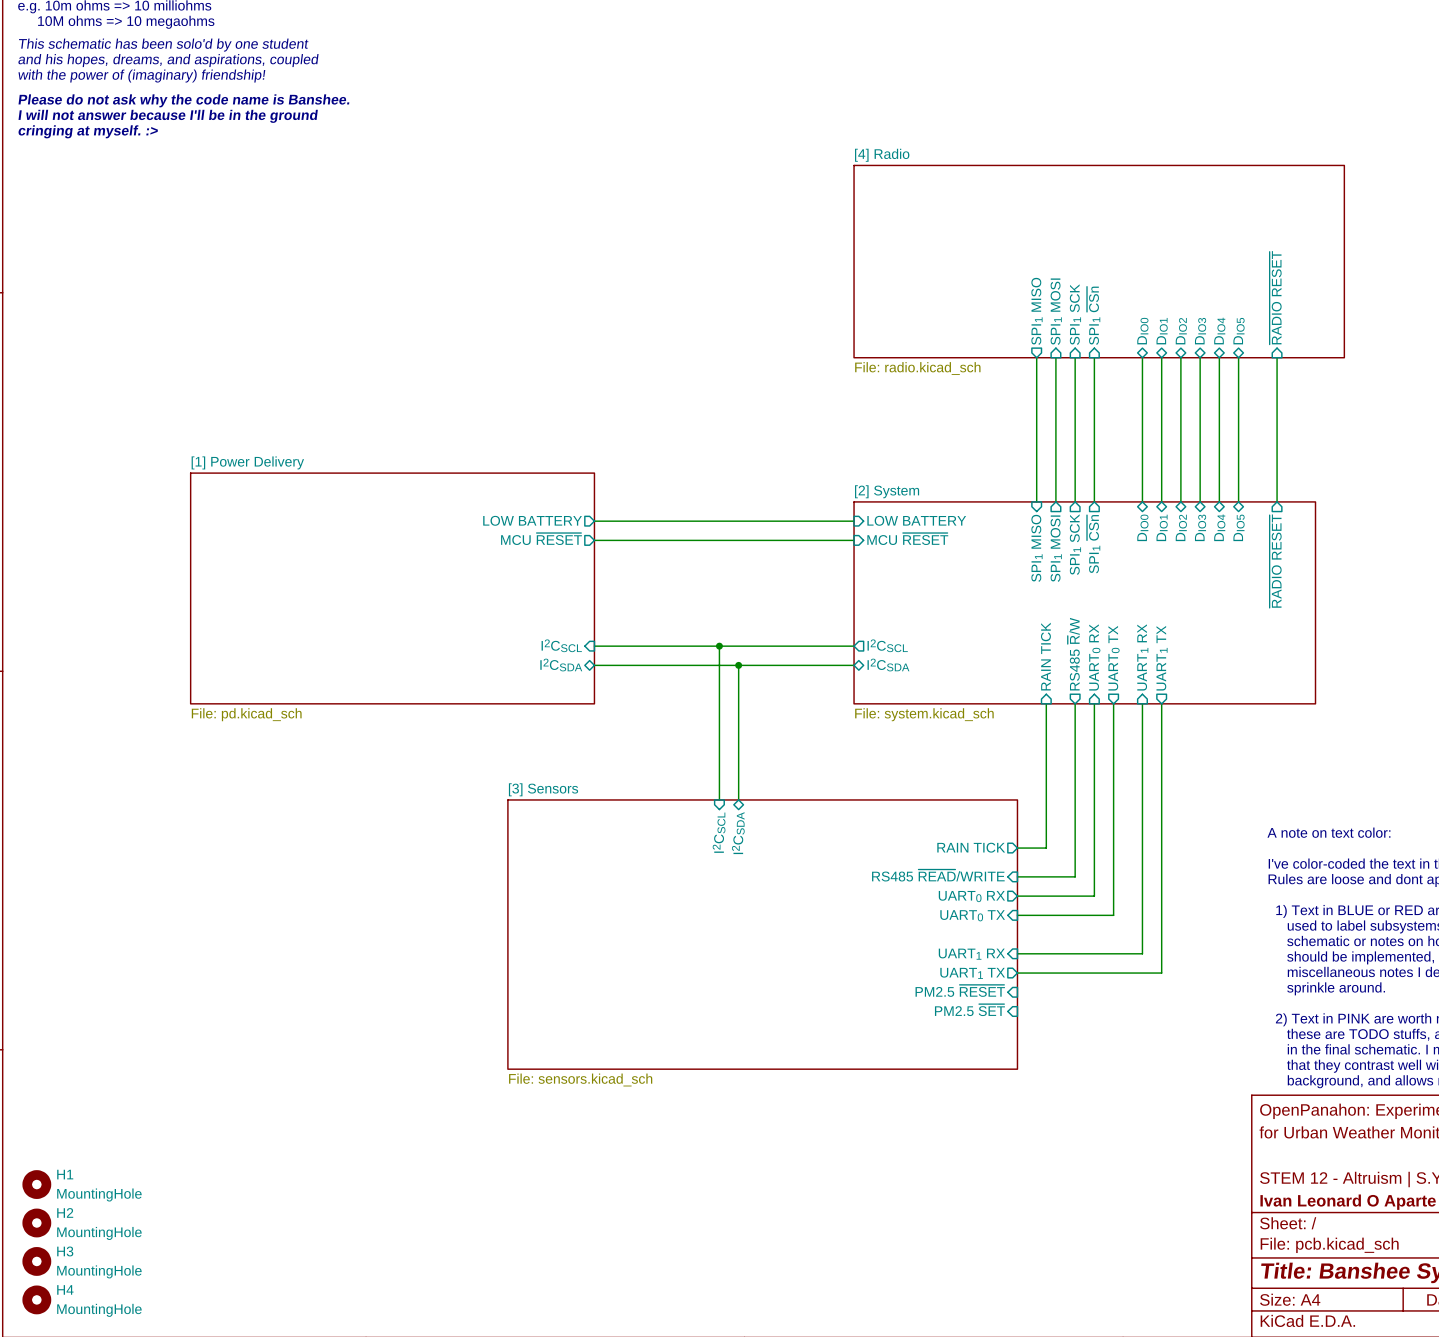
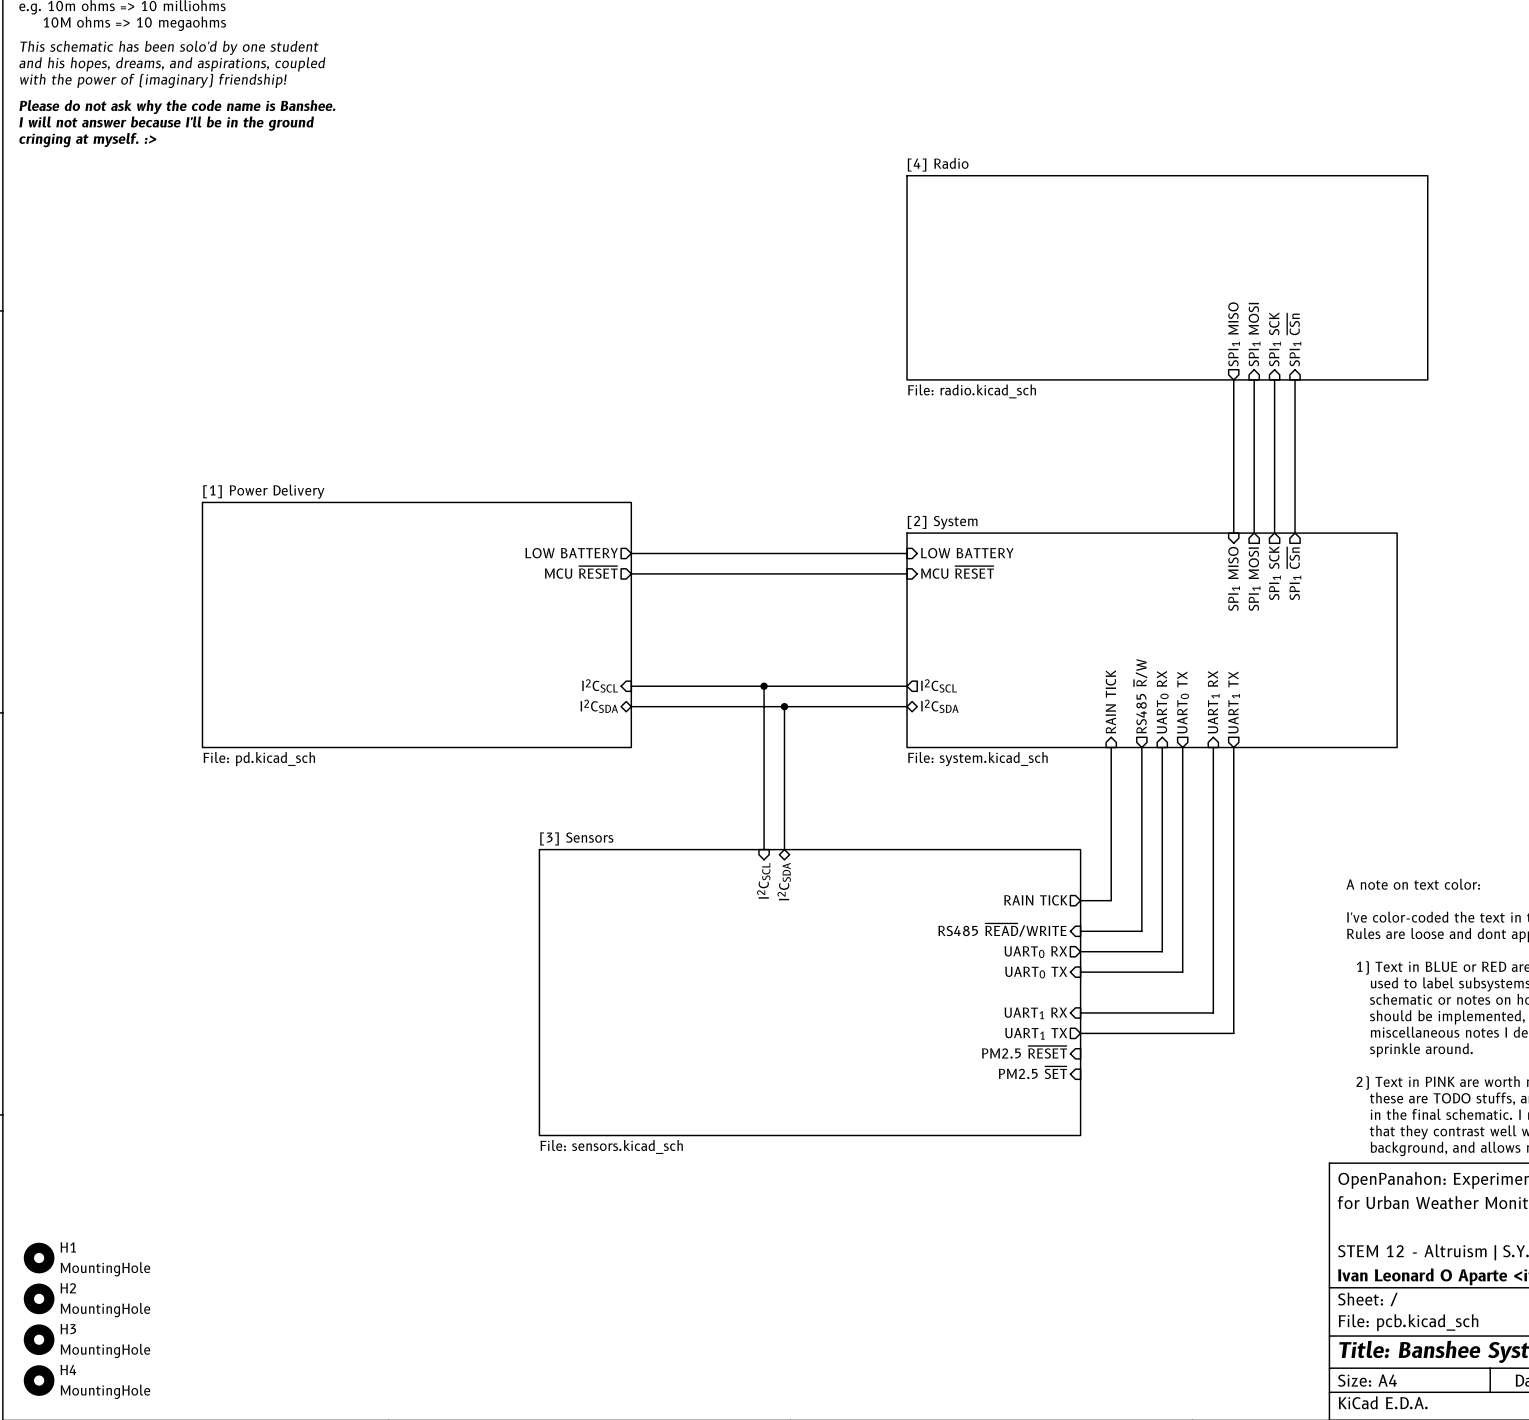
sheet pin: ~{RADIO RESET} (1275, 297) -> none
sheet pin: SPI1 MISO (1036, 311) -> none
sheet pin: SPI1 MOSI (1056, 311) -> none
sheet pin: SPI1 SCK (1075, 314) -> none
sheet pin: SPI1 ~{CSn} (1093, 315) -> none
sheet pin: DIO0 (1142, 331) -> none
sheet pin shape: bidirectional (1162, 331) -> output (1234, 334)
sheet pin: DIO1 (1162, 331) -> SPI1 MISO (1234, 334)
sheet pin shape: bidirectional (1181, 331) -> input (1254, 334)
sheet pin: DIO2 (1181, 331) -> SPI1 MOSI (1254, 334)
sheet pin shape: bidirectional (1200, 331) -> input (1274, 339)
sheet pin: DIO3 (1200, 331) -> SPI1 SCK (1274, 339)
sheet pin shape: bidirectional (1219, 331) -> input (1294, 339)
sheet pin: DIO4 (1219, 331) -> SPI1 ~{CSn} (1294, 339)
sheet pin: DIO5 (1239, 331) -> none
wire: (1036, 357) (1036, 501) -> none
wire: (1055, 357) (1055, 501) -> none
wire: (1075, 357) (1075, 501) -> none
wire: (1094, 357) (1094, 501) -> none
wire: (1142, 357) (1142, 501) -> none
wire: (1238, 357) (1238, 501) -> none
wire: (1277, 357) (1277, 501) -> none
sheet pin: DIO0 (1142, 527) -> none
sheet pin shape: bidirectional (1162, 527) -> input (1234, 578)
sheet pin: DIO1 (1162, 527) -> SPI1 MISO (1234, 578)
sheet pin shape: bidirectional (1181, 527) -> output (1254, 579)
sheet pin: DIO2 (1181, 527) -> SPI1 MOSI (1254, 579)
sheet pin shape: bidirectional (1200, 527) -> output (1274, 573)
sheet pin: DIO3 (1200, 527) -> SPI1 SCK (1274, 573)
sheet pin shape: bidirectional (1219, 527) -> output (1294, 573)
sheet pin: DIO4 (1219, 527) -> SPI1 ~{CSn} (1294, 573)
sheet pin: DIO5 (1239, 527) -> none
sheet pin: SPI1 SCK (1075, 544) -> none
sheet pin: SPI1 ~{CSn} (1093, 544) -> none
sheet pin: SPI1 MISO (1036, 548) -> none
sheet pin: SPI1 MOSI (1056, 548) -> none
sheet pin: ~{RADIO RESET} (1275, 561) -> none

